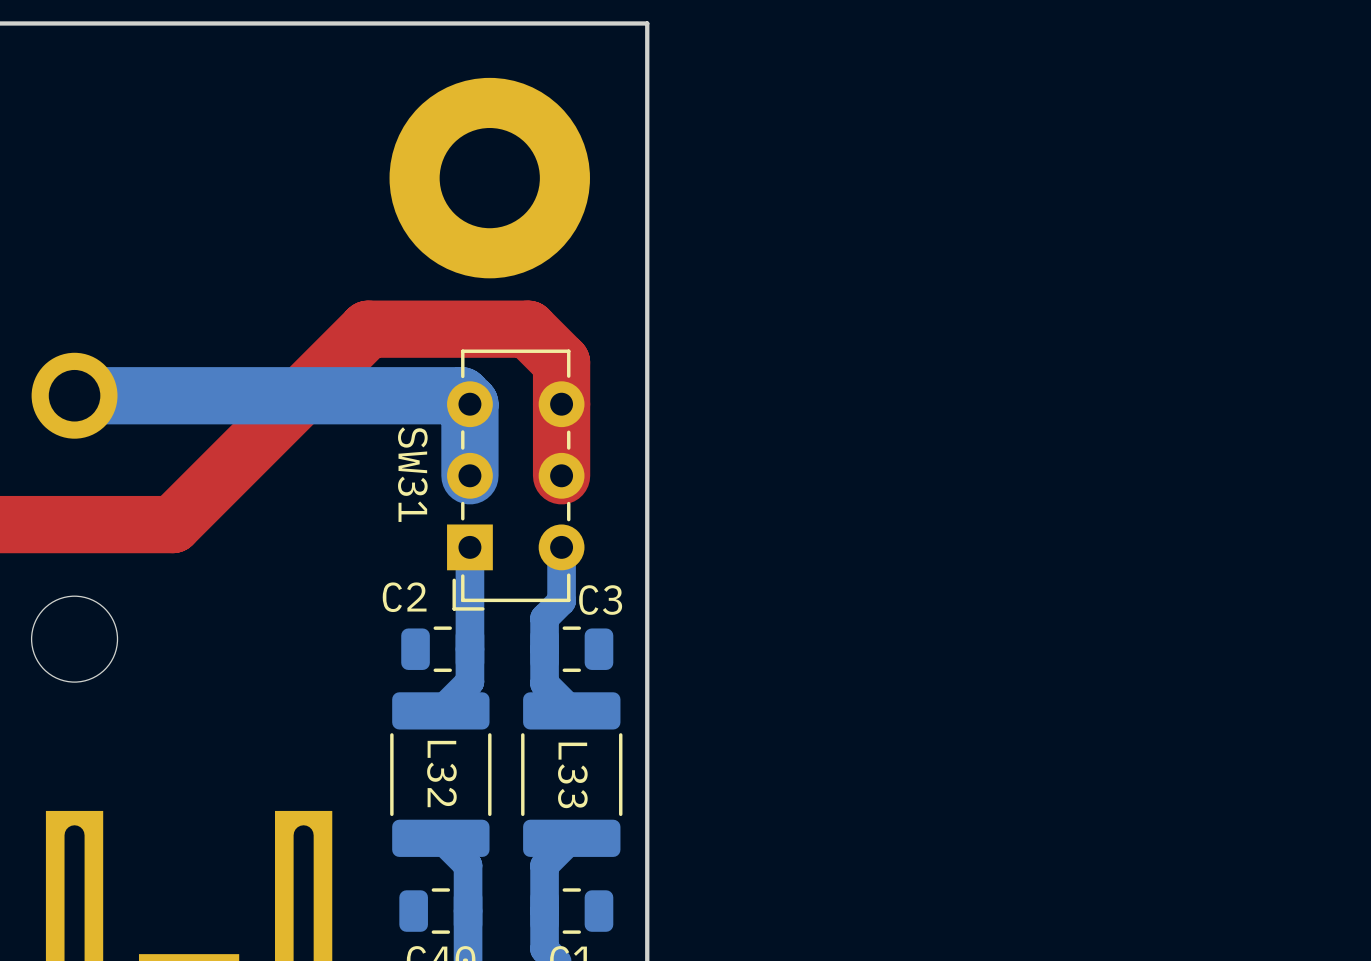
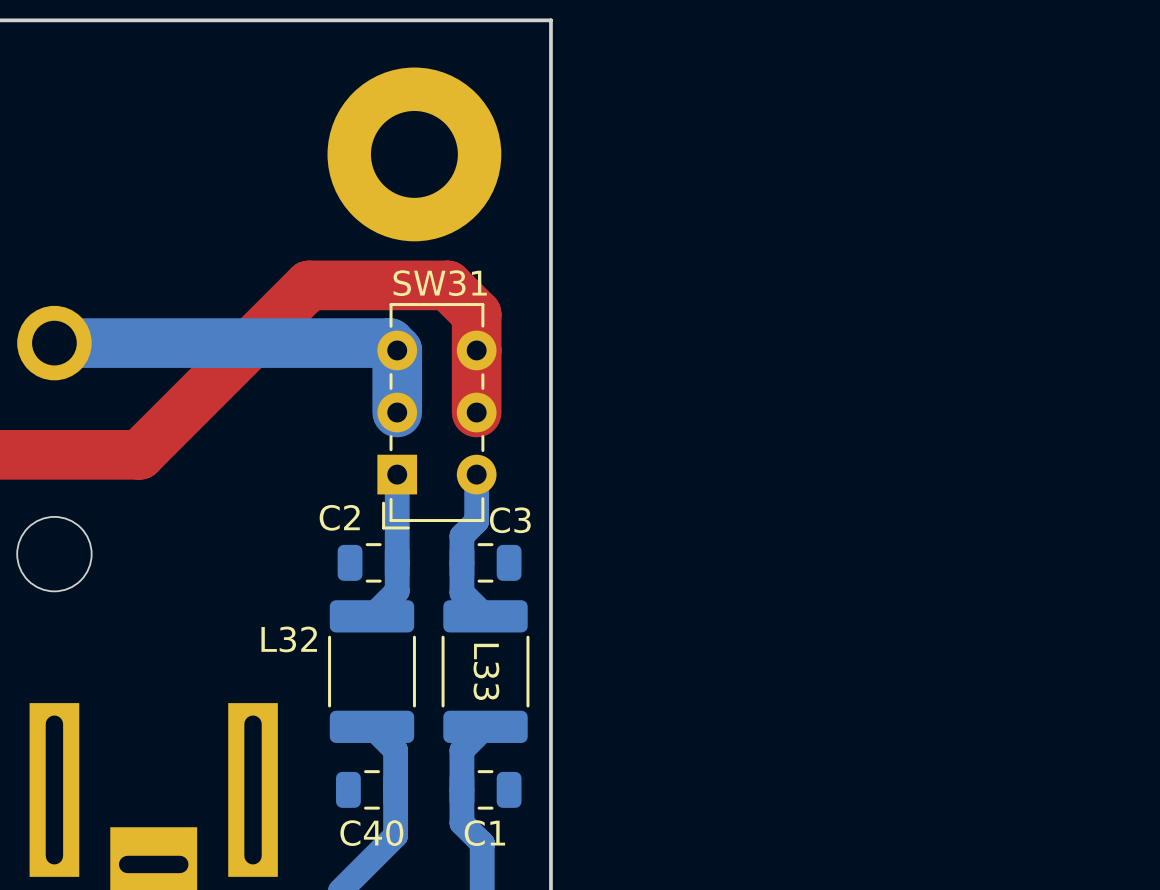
SW31 name rotation: 0° (412, 474) -> 90° counterclockwise (440, 283)
SW31 name position: SW31 (412, 474) -> SW31 (440, 283)
L32 name rotation: 0° (441, 774) -> 90° counterclockwise (289, 639)
L32 name position: L32 (441, 774) -> L32 (289, 639)

